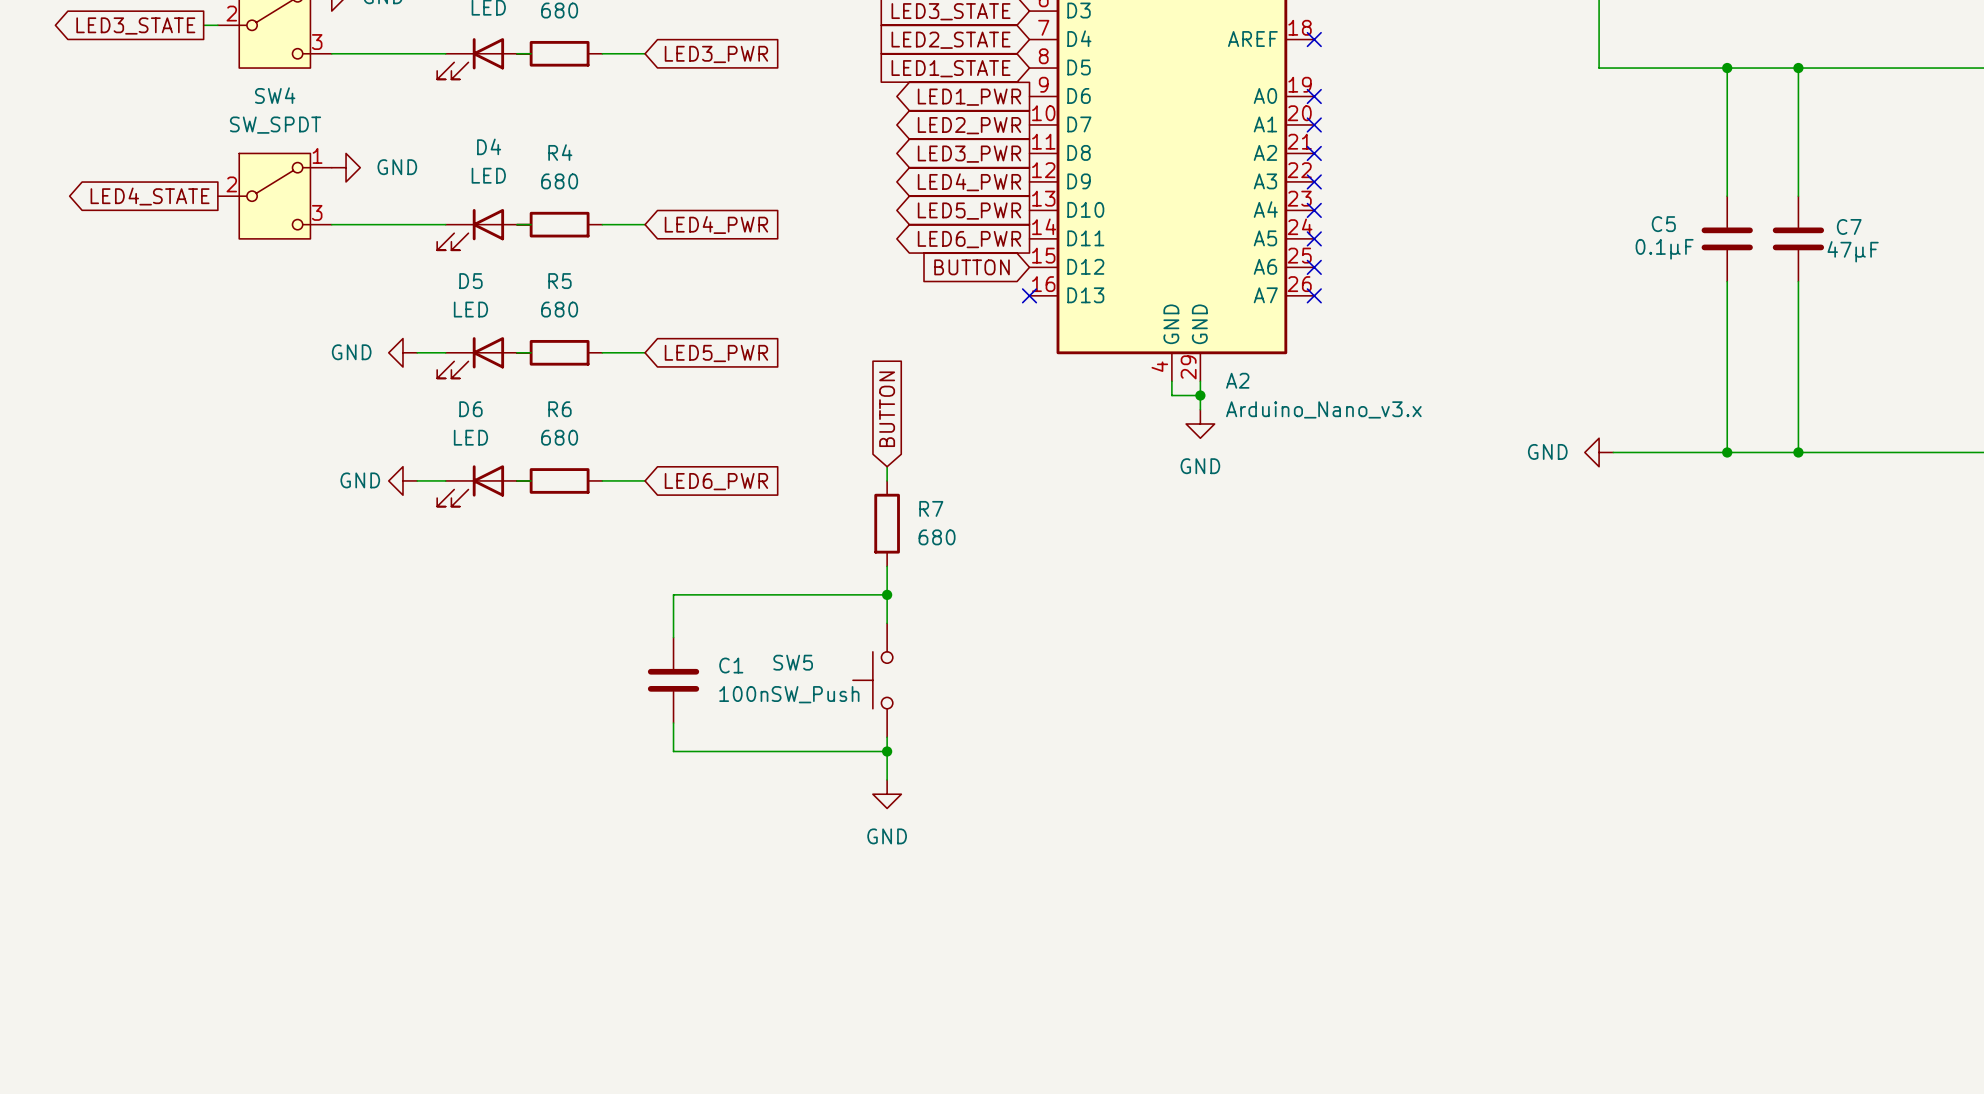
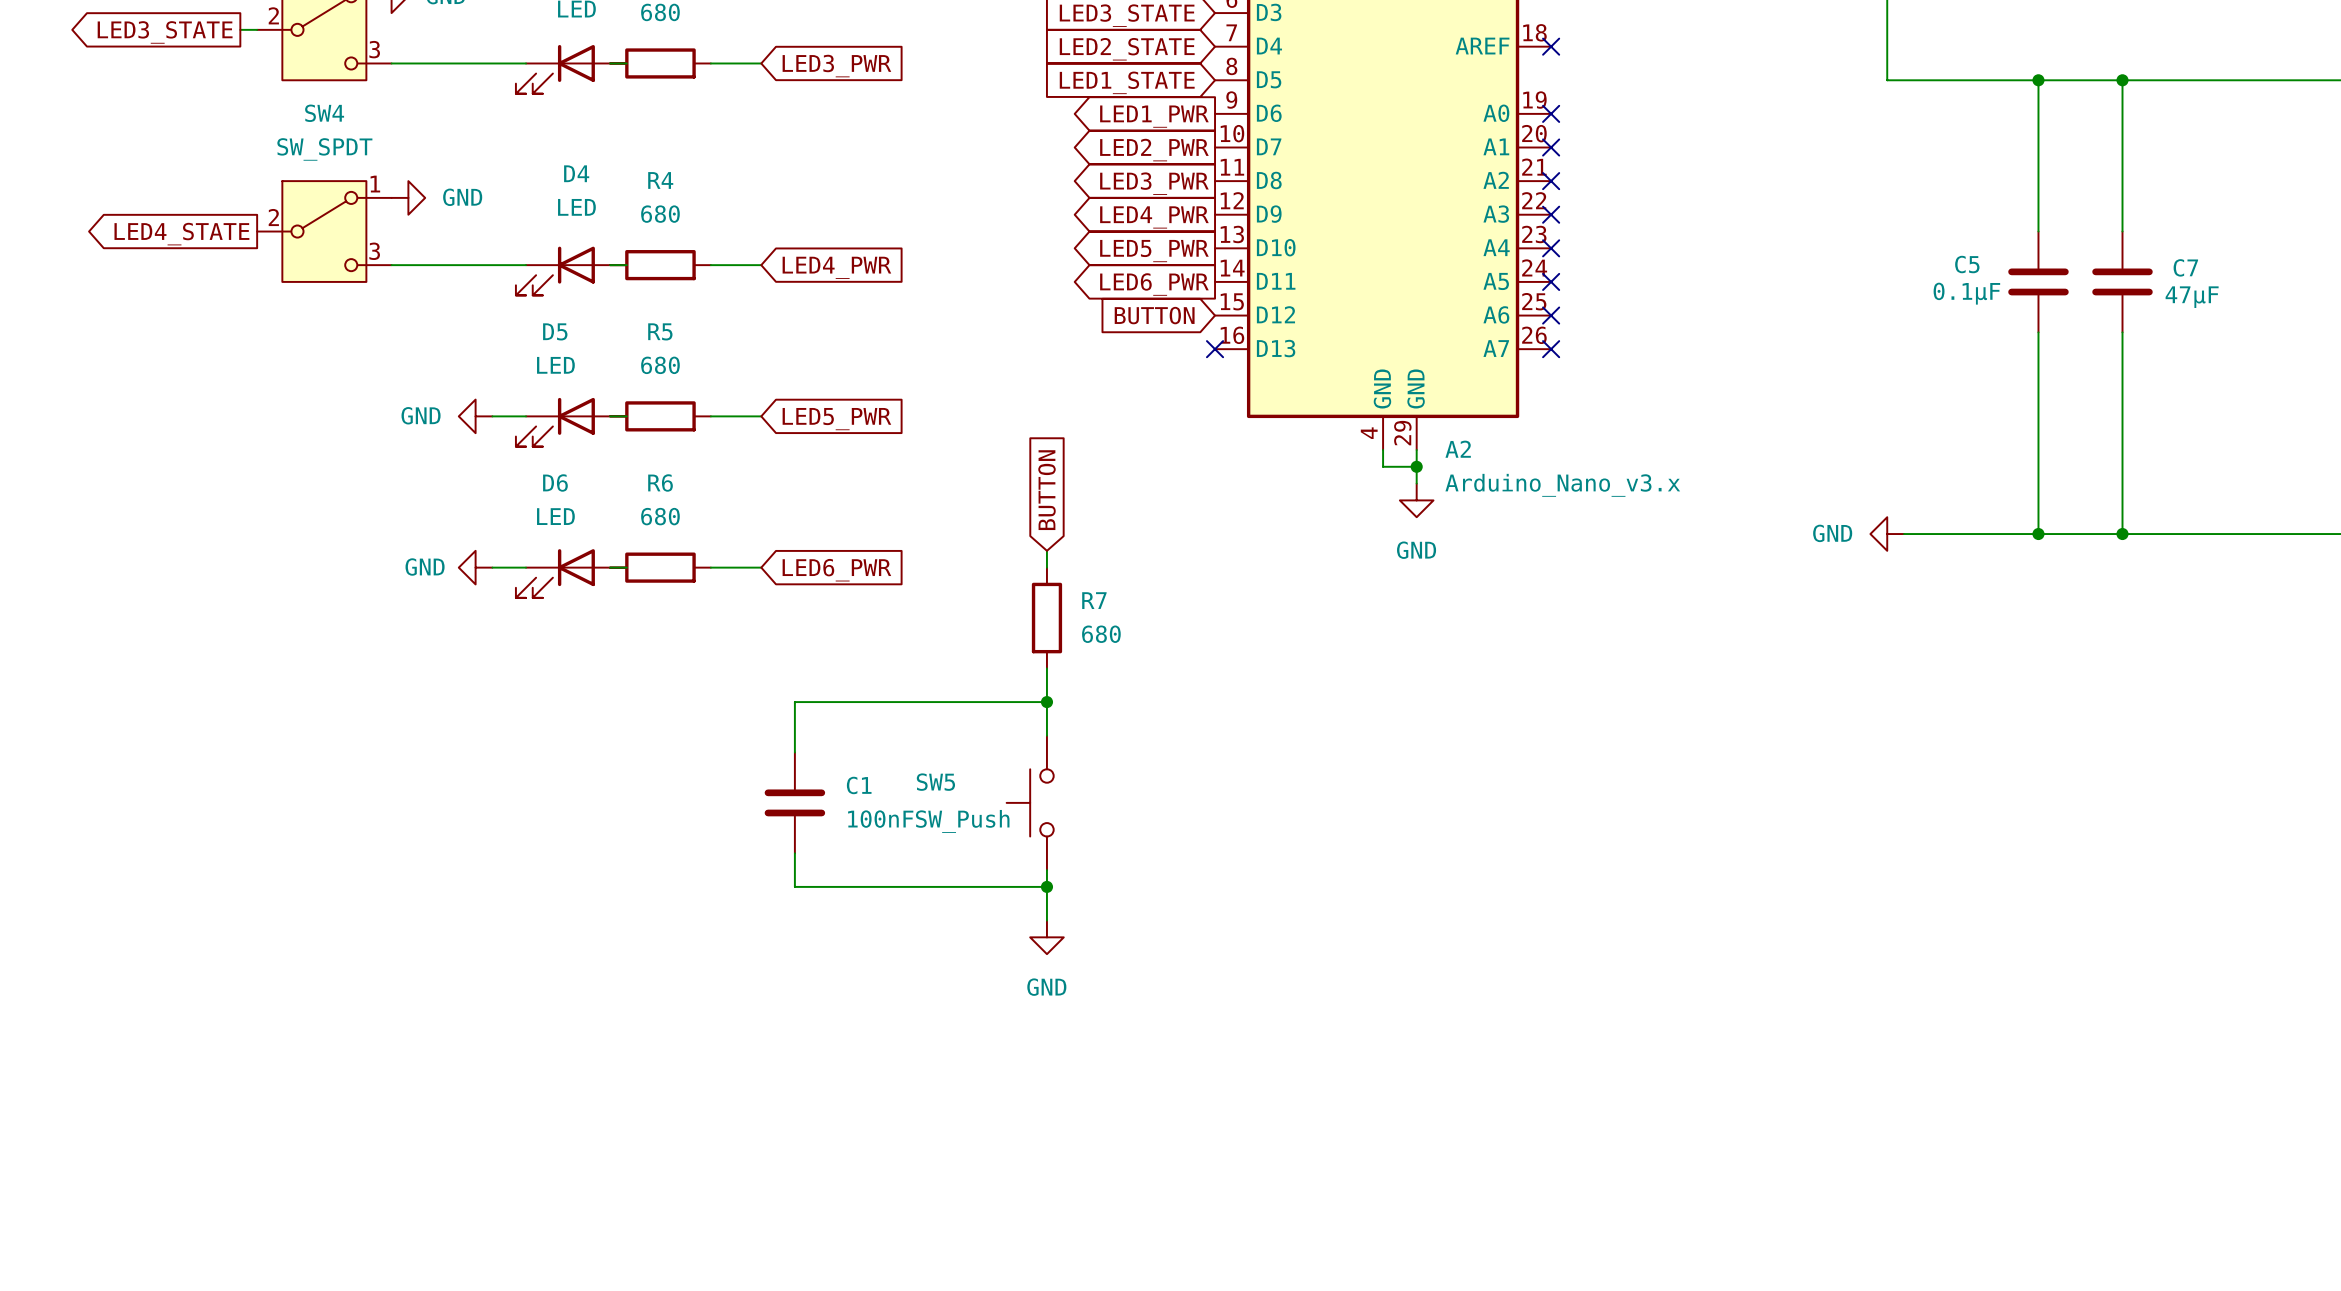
C1 value: 100n (743, 694) -> 100nF (880, 819)

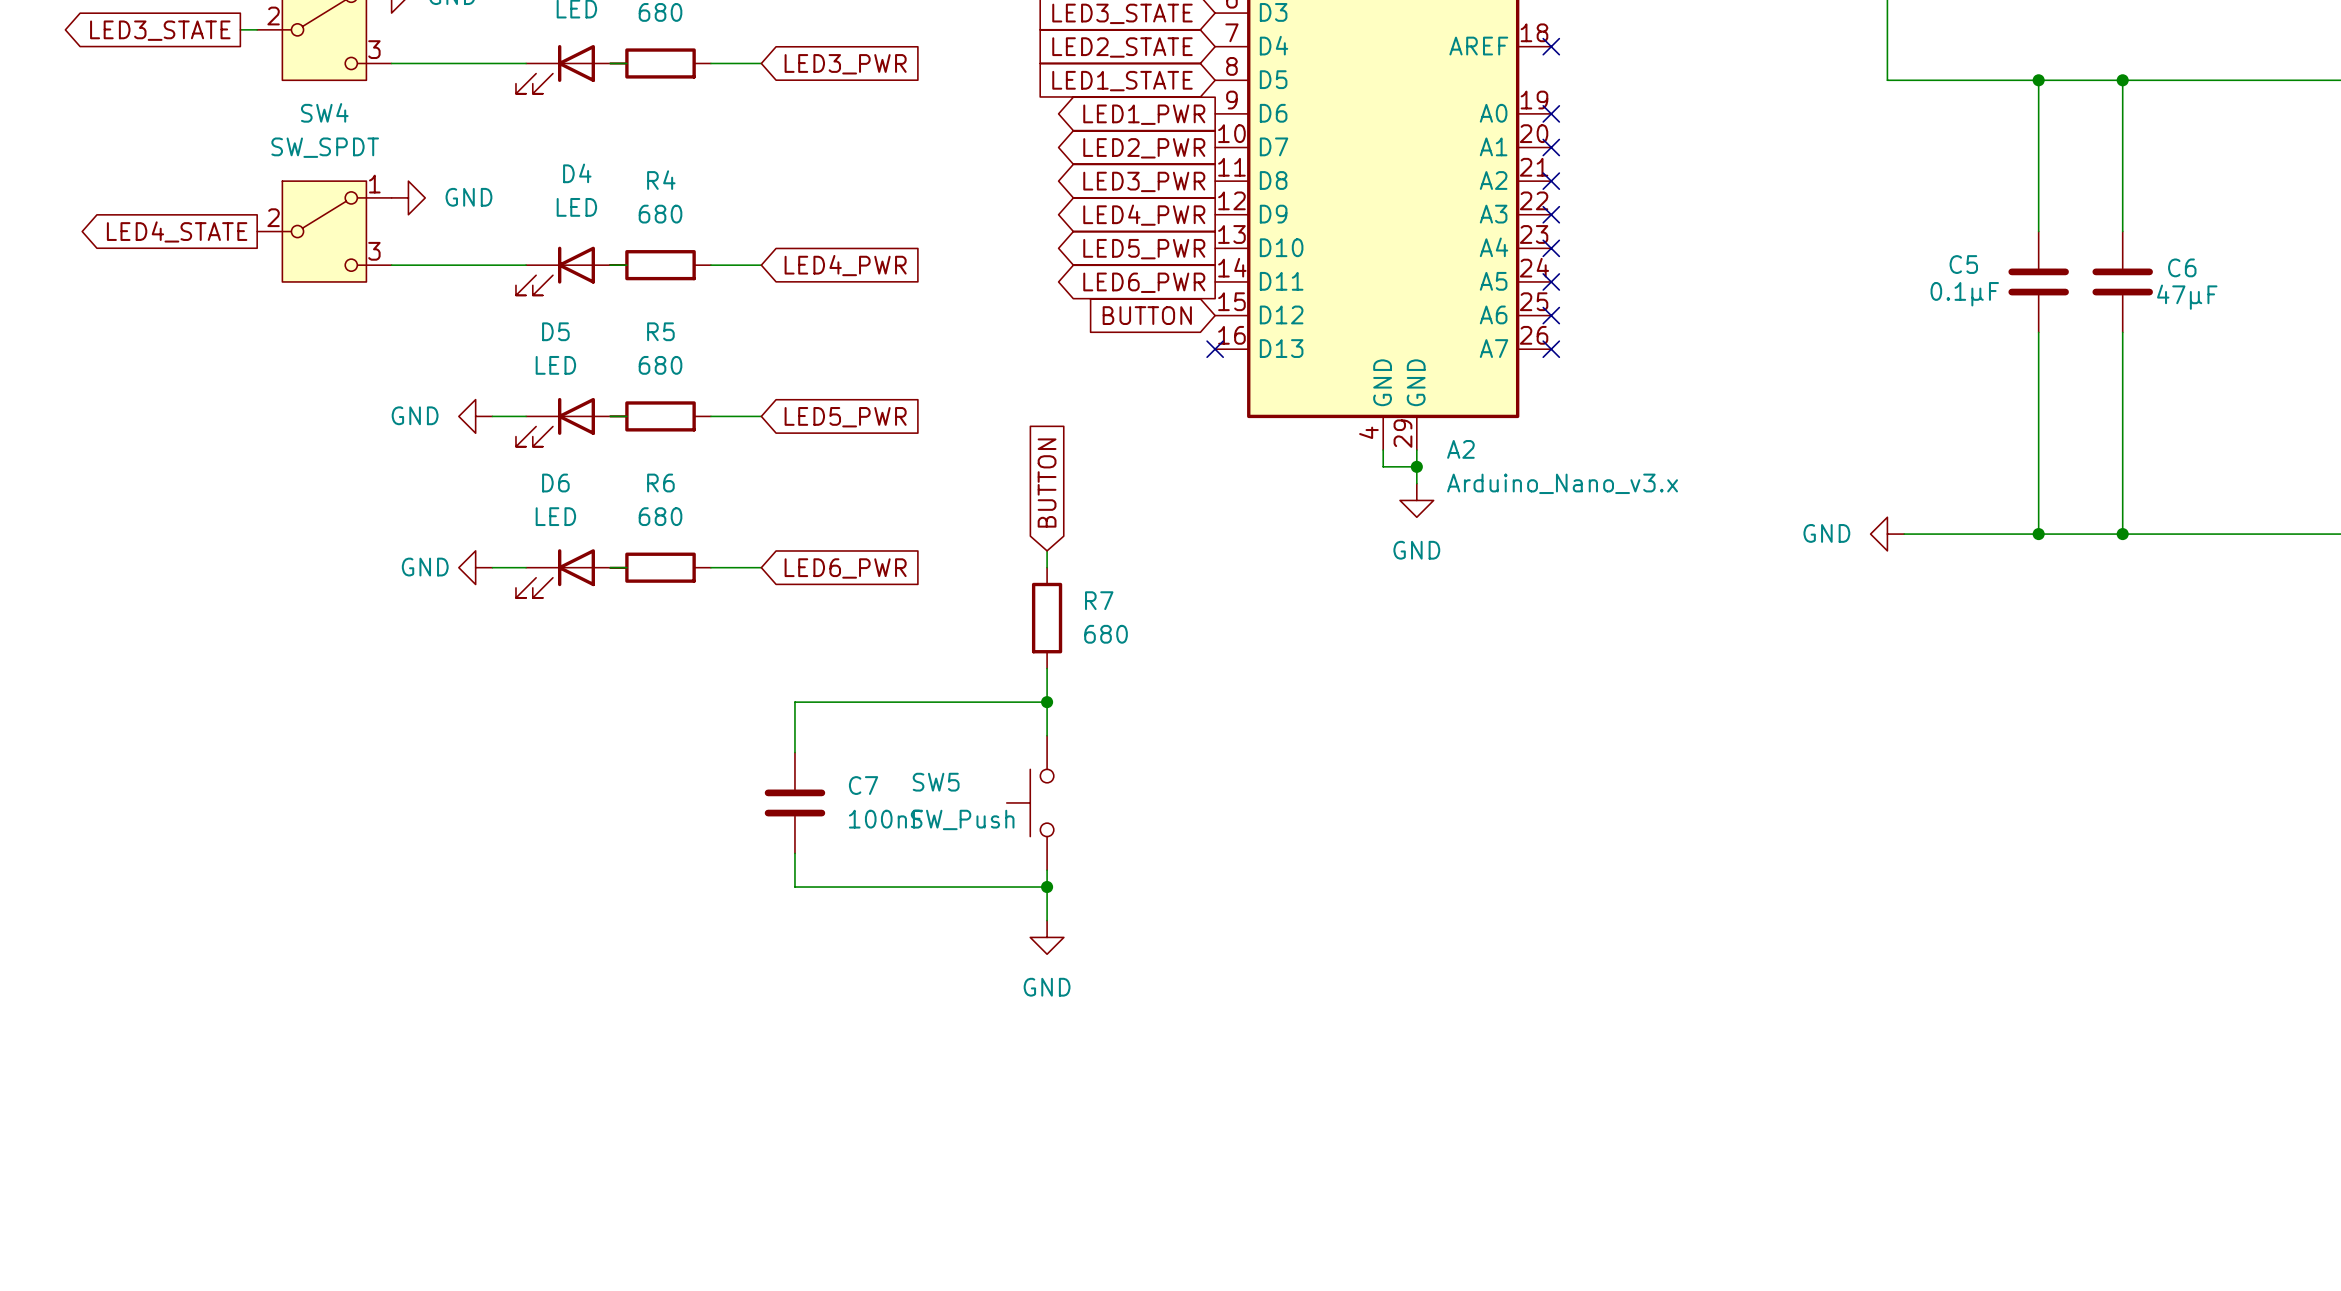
C7 name: C7 (2185, 267) -> C6 (2182, 267)
C1 name: C1 (859, 785) -> C7 (863, 785)

